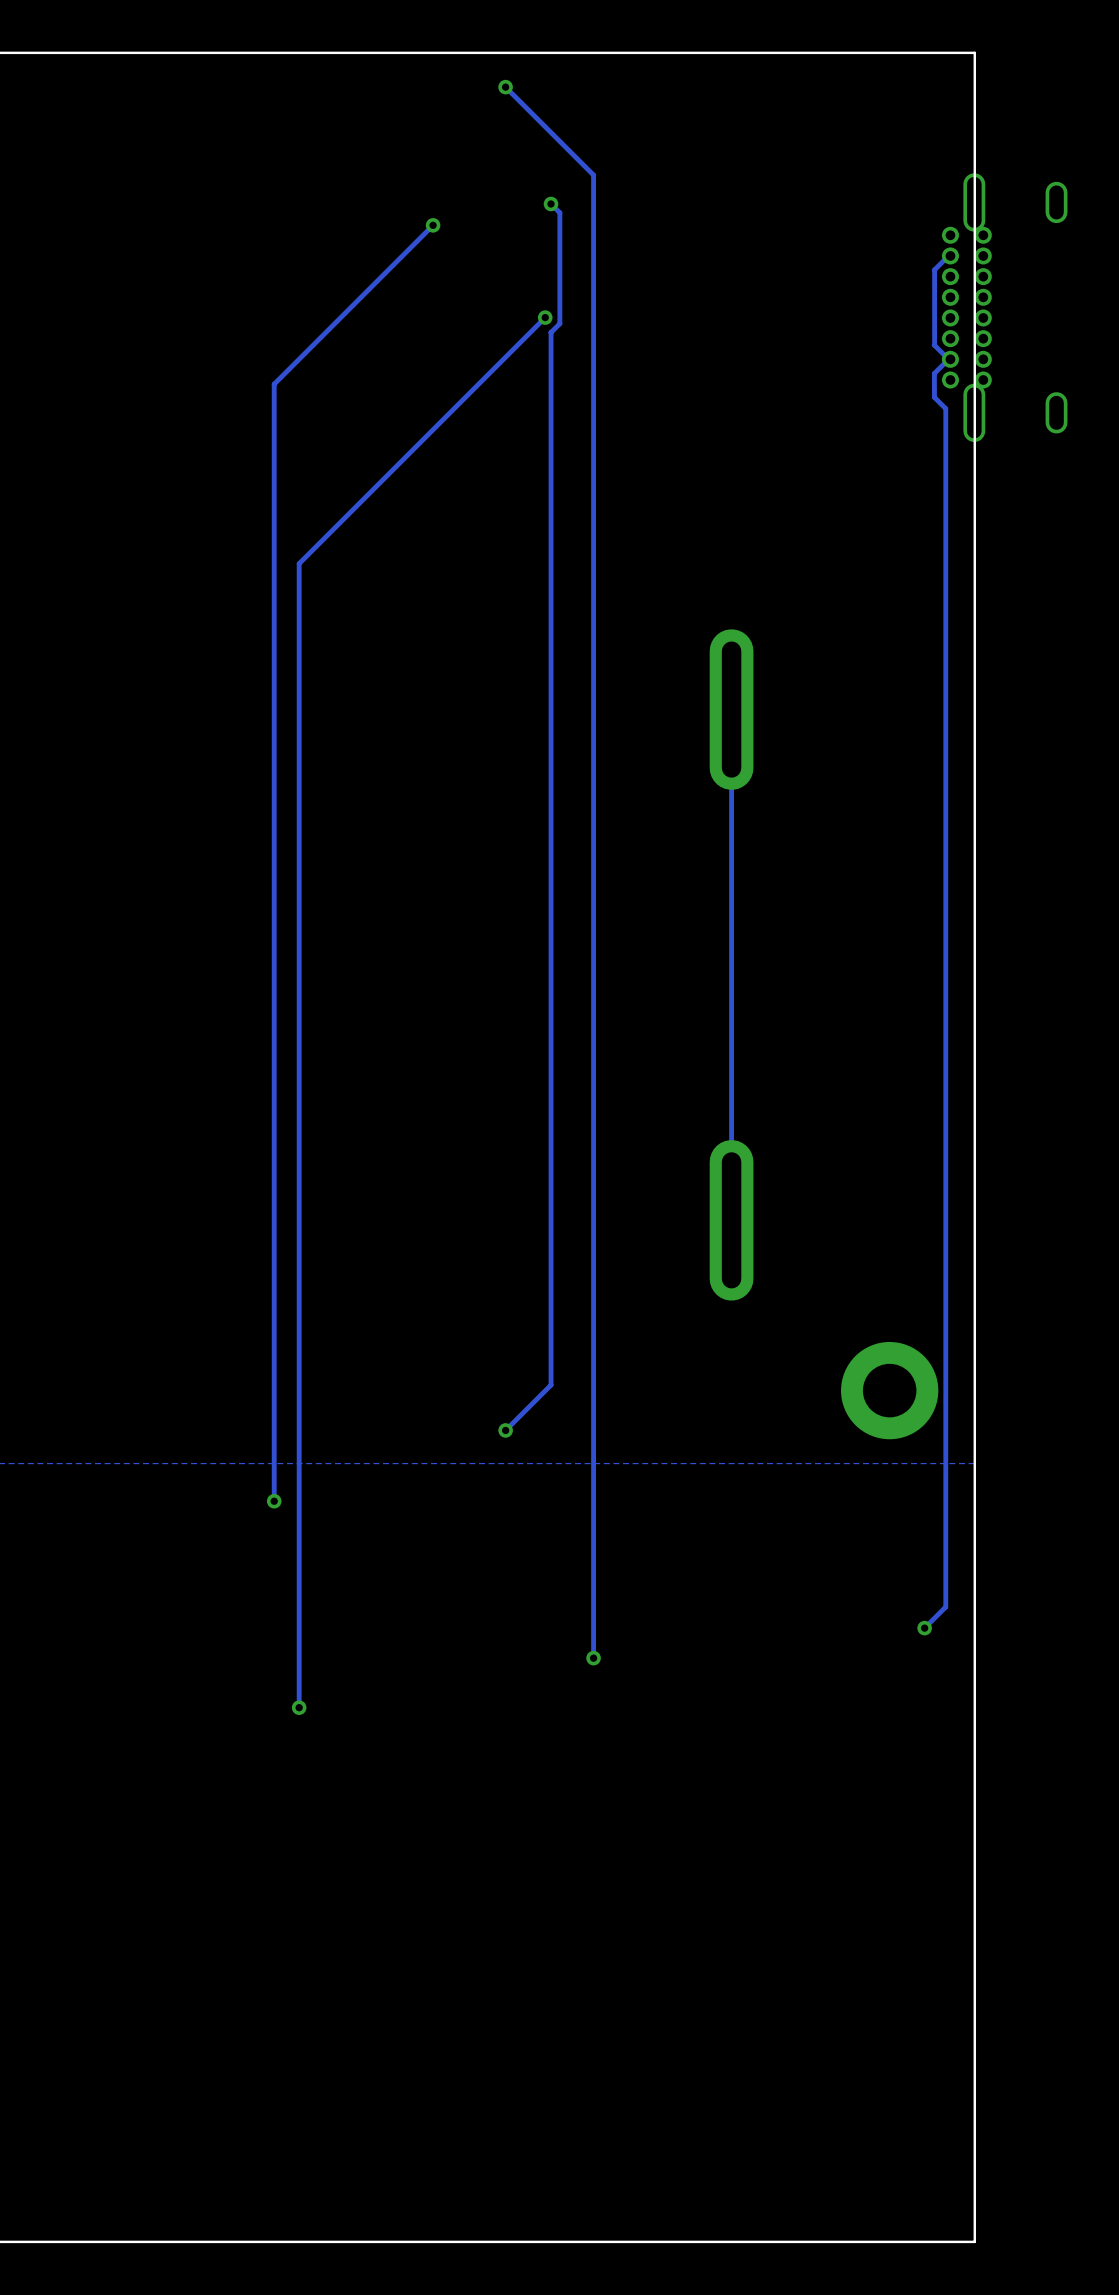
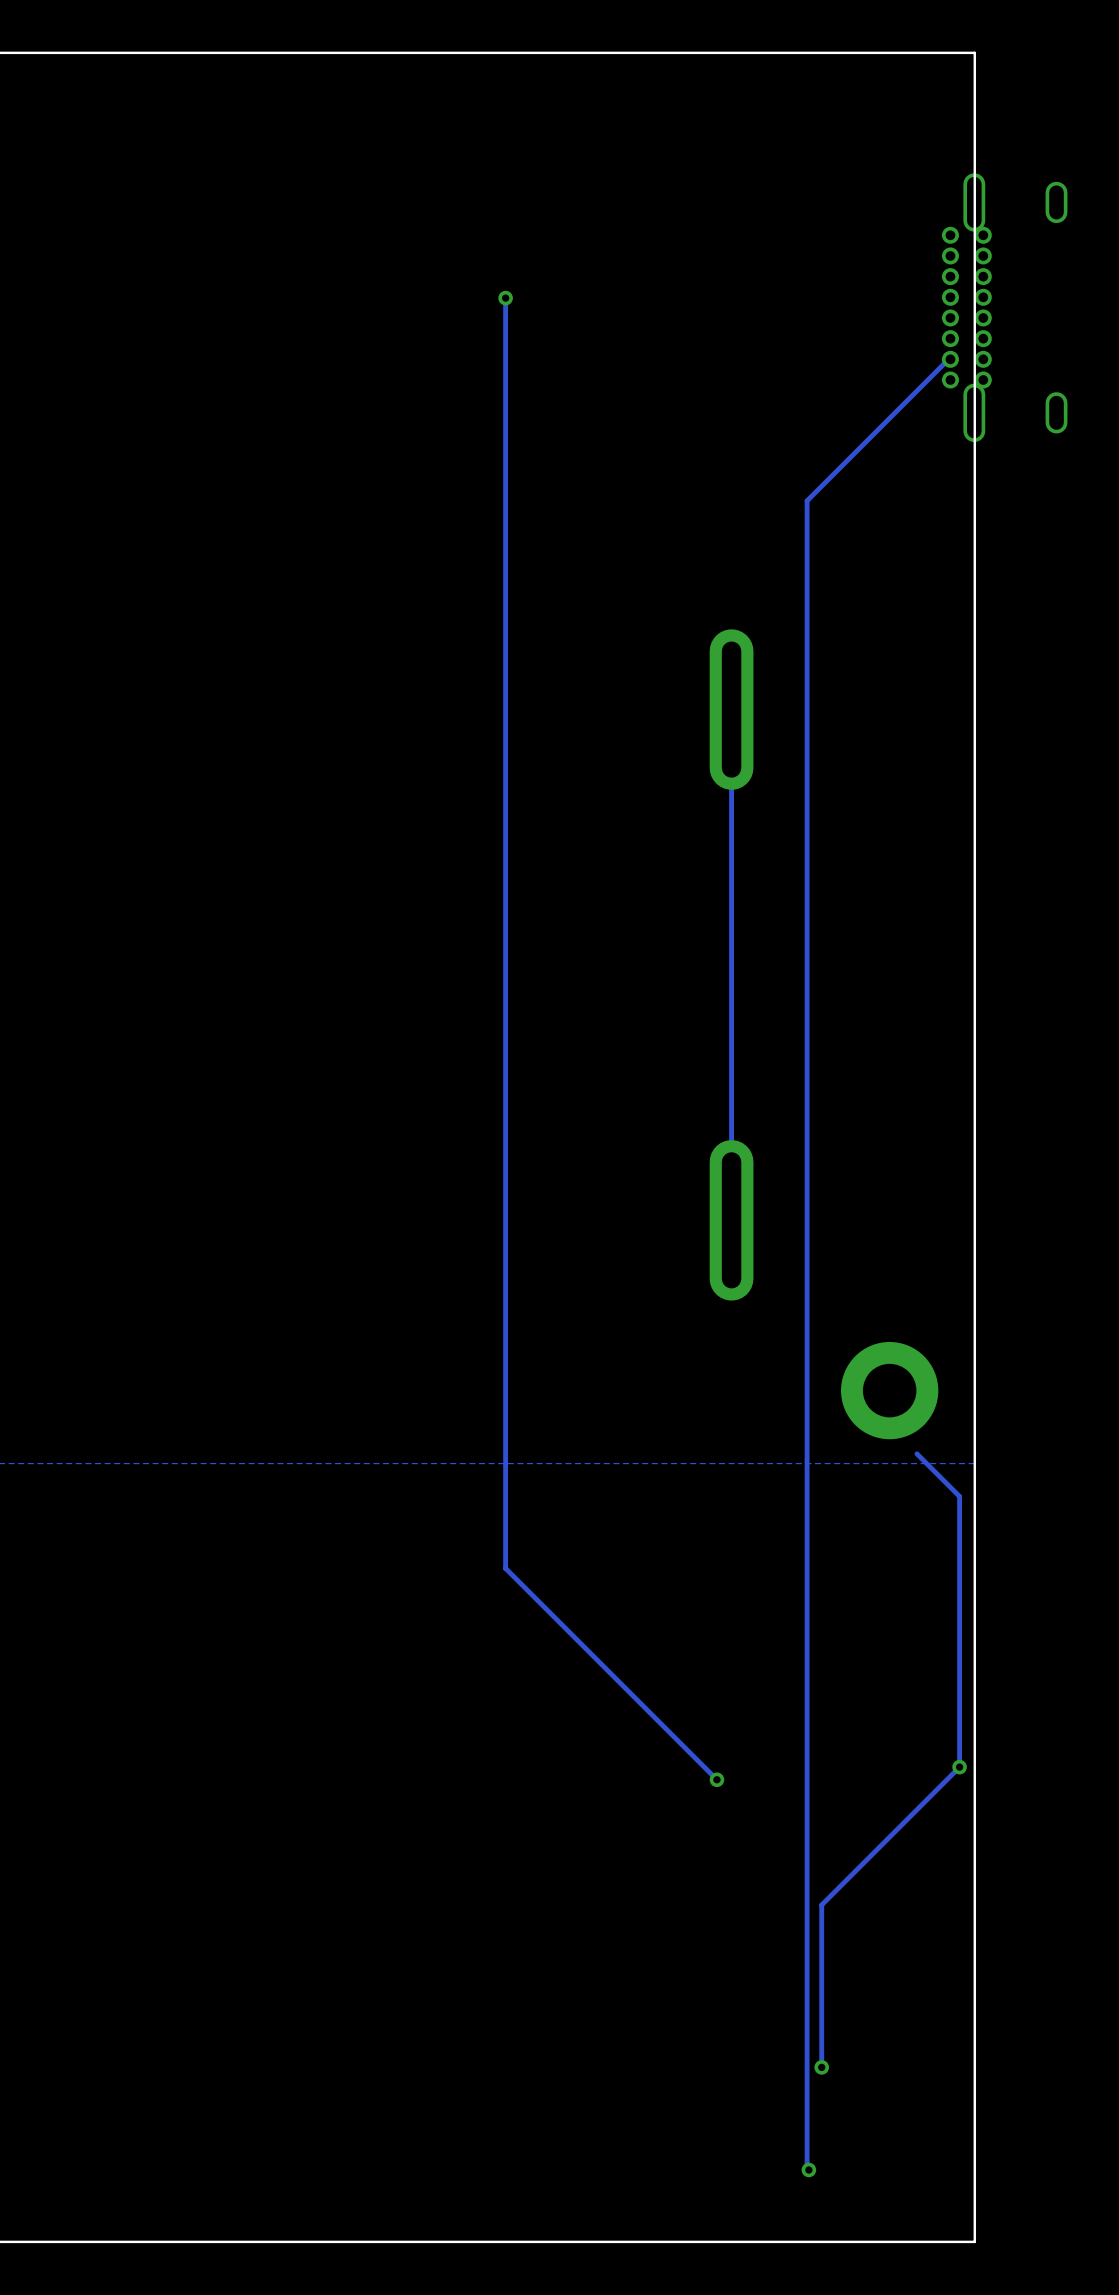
track: (505, 87) (593, 175) (593, 1658) -> none
via: (505, 87) -> none
track: (551, 203) (559, 212) (559, 323) (551, 332) (551, 1385) (505, 1430) -> none
via: (551, 203) -> none
track: (433, 225) (274, 384) (274, 1501) -> none
via: (433, 225) -> none
track: (950, 255) (934, 269) (934, 345) (948, 359) -> none
track: none -> (505, 298) (505, 1568) (716, 1779)
track: (545, 317) (299, 563) (299, 1707) -> none
via position: (545, 317) -> (505, 298)
track: (934, 373) (934, 397) (945, 408) (945, 1606) (924, 1628) -> (934, 373) (807, 500) (807, 2168) (808, 2169)
via: (505, 1430) -> none
track: none -> (916, 1453) (959, 1496) (959, 1767) (821, 1905) (821, 2067)
via: (274, 1501) -> none
via: (924, 1628) -> none
via: (593, 1658) -> none
via: (299, 1707) -> none
via: none -> (959, 1767)
via: none -> (716, 1779)
via: none -> (821, 2067)
via: none -> (808, 2169)

